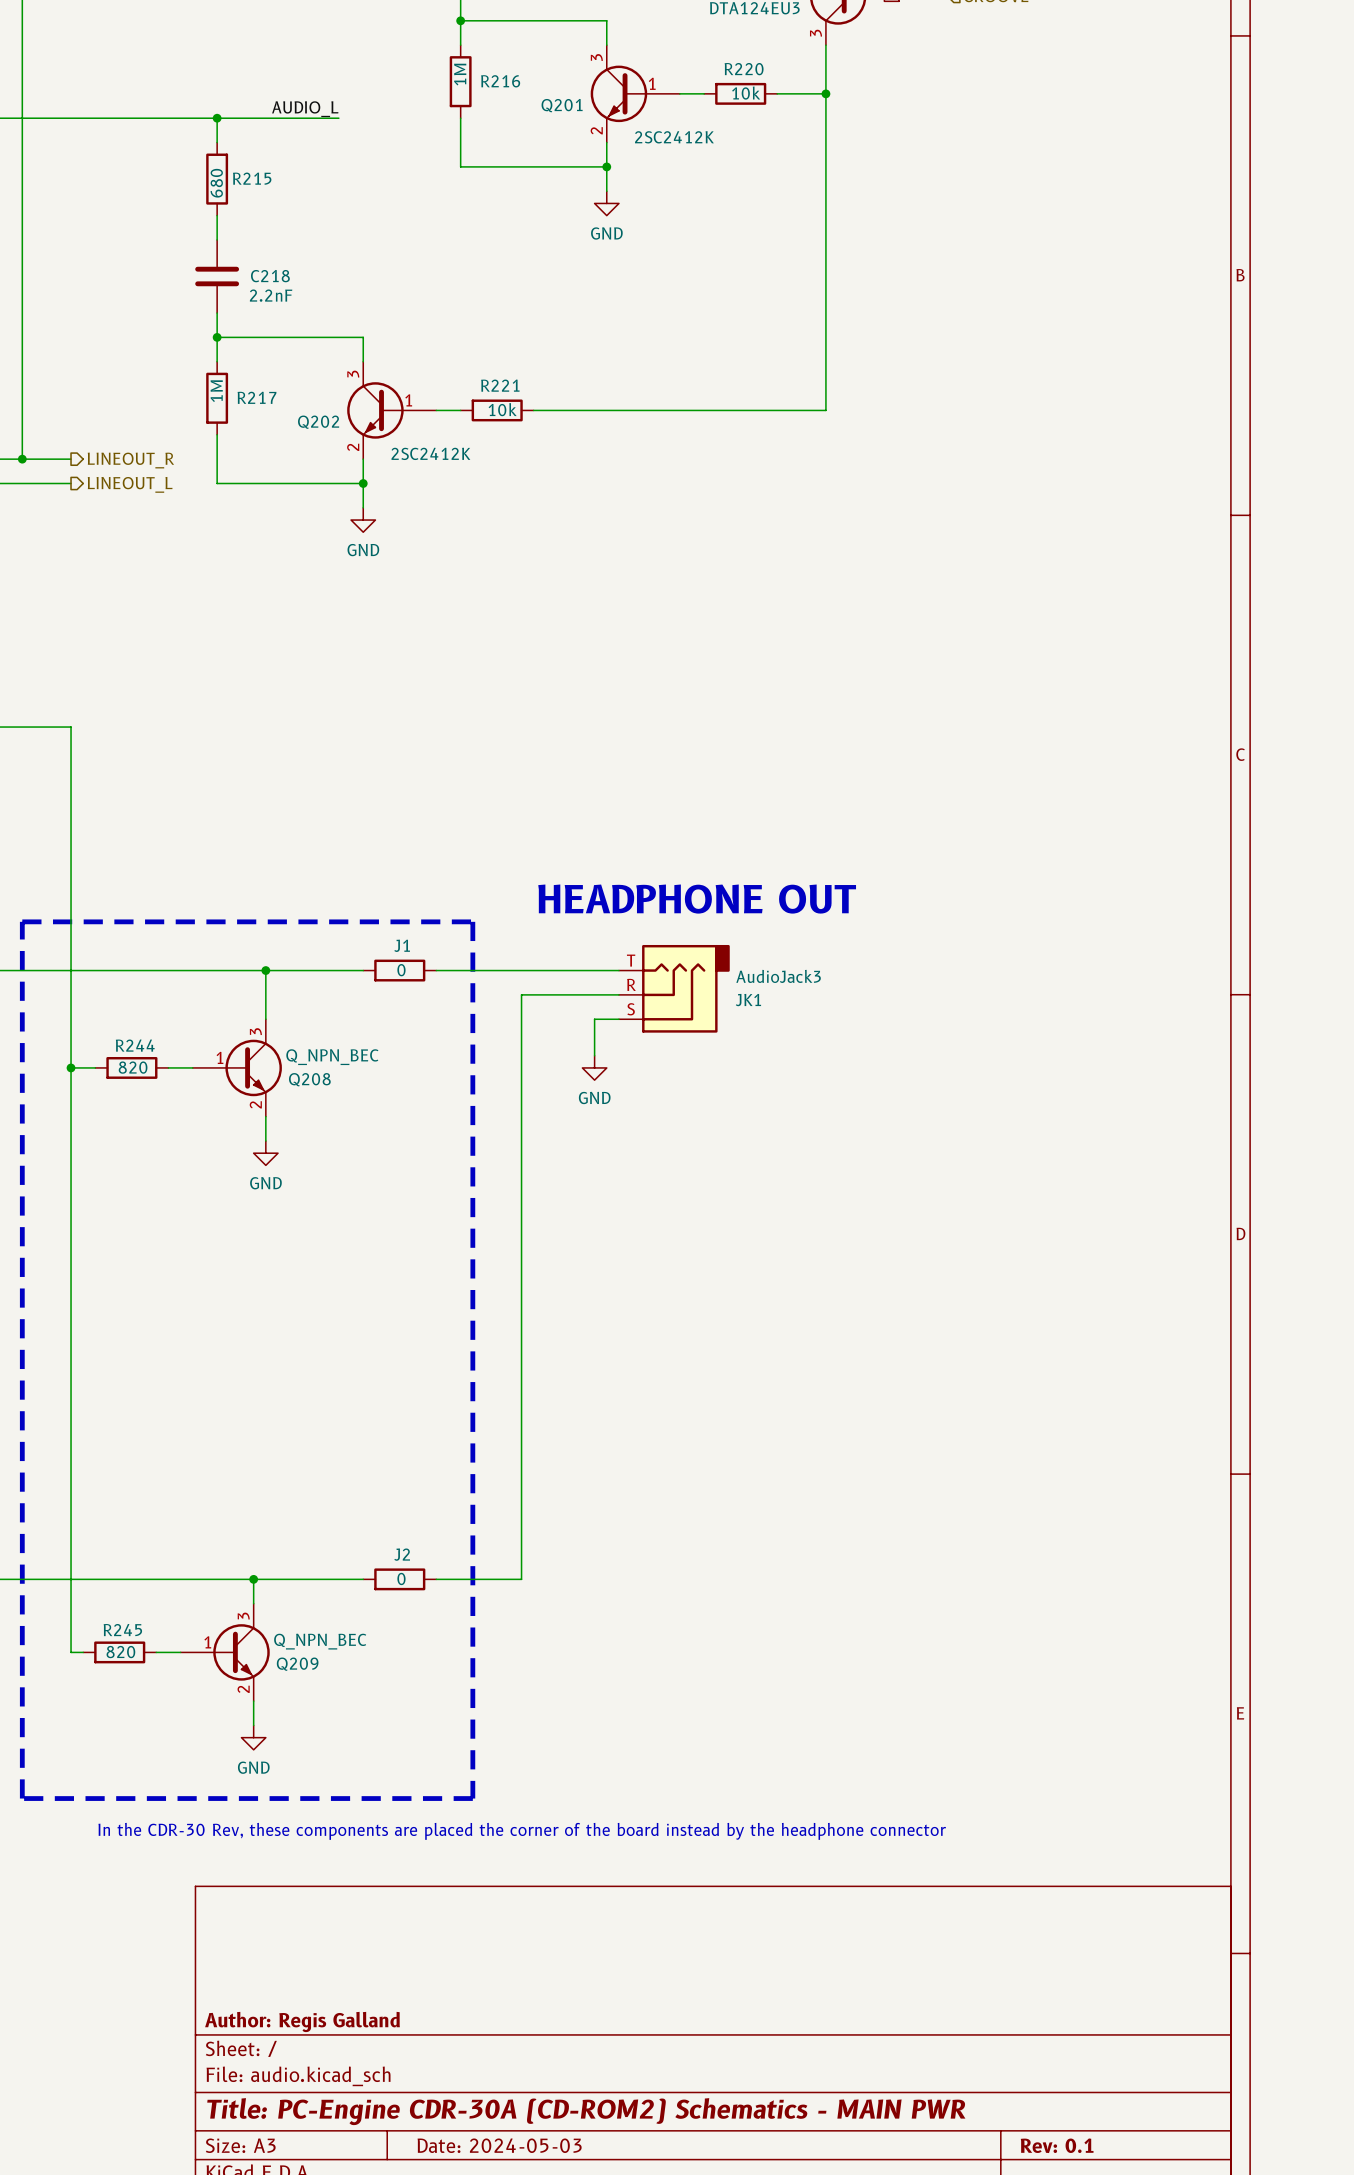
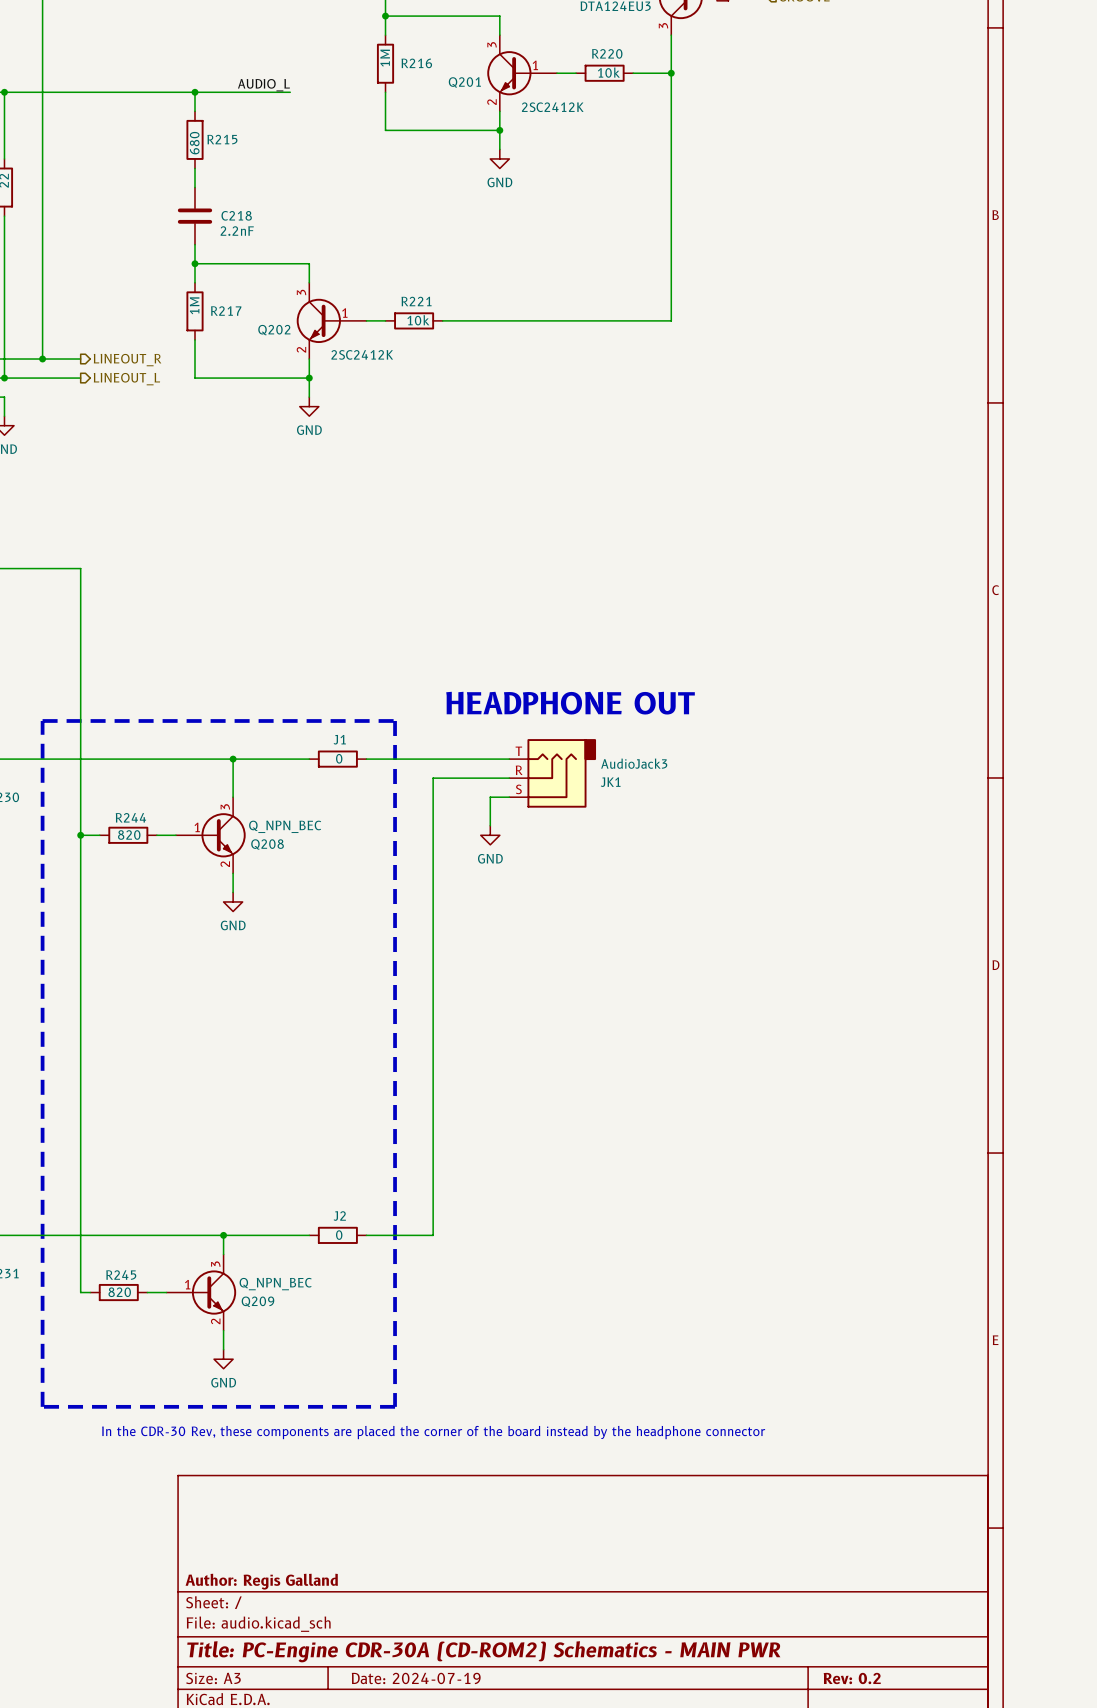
title block: Date: 2024-05-03 (499, 2145) -> Date: 2024-07-19 (416, 1678)
title block: Rev: 0.1 (1057, 2145) -> Rev: 0.2 (852, 1678)

